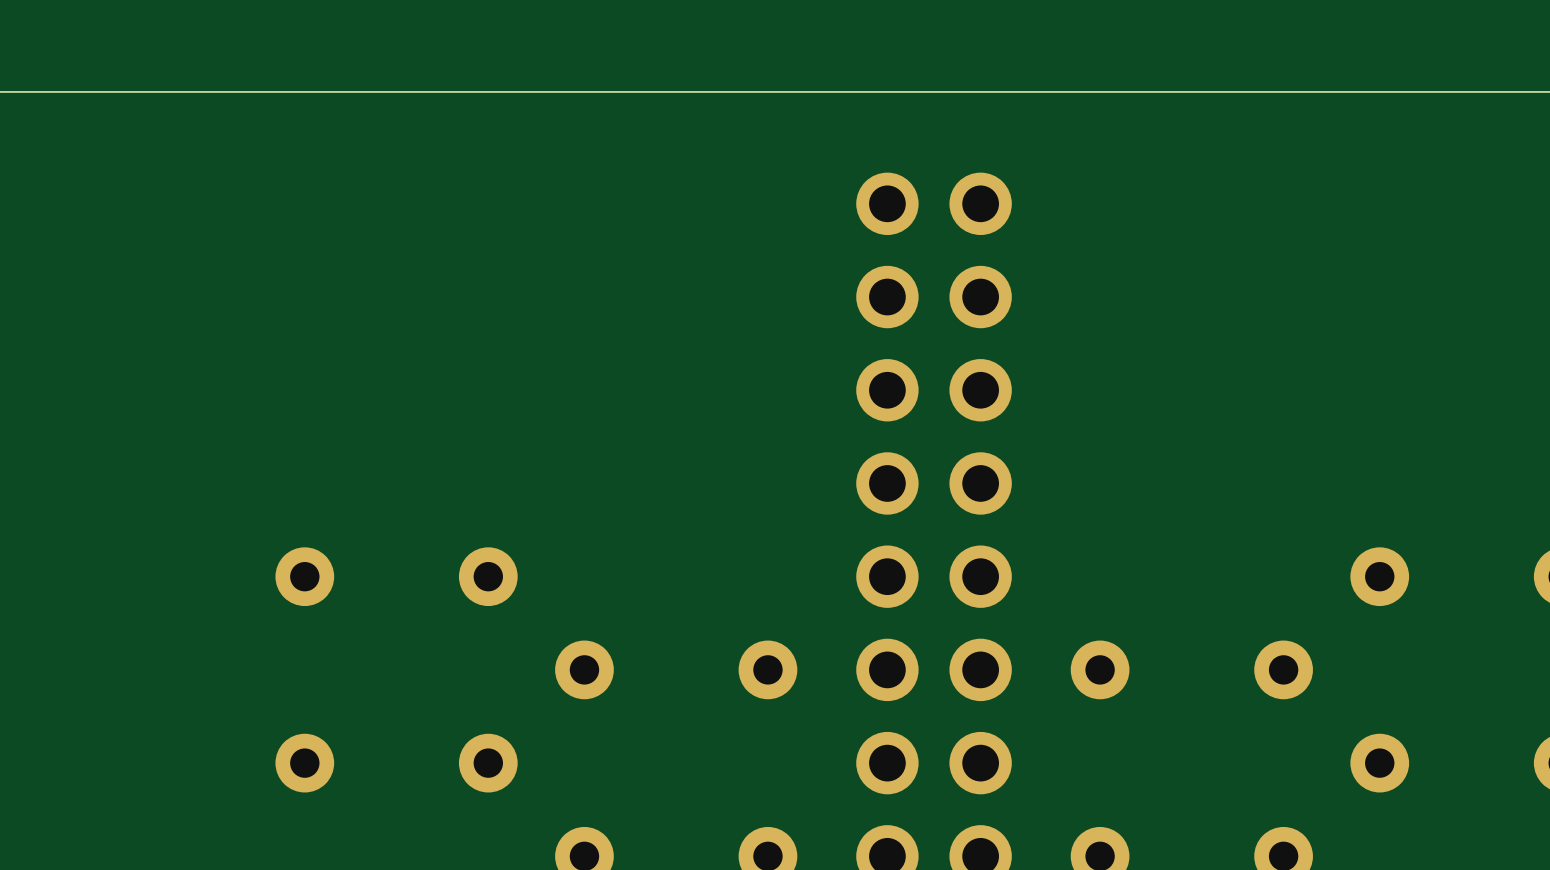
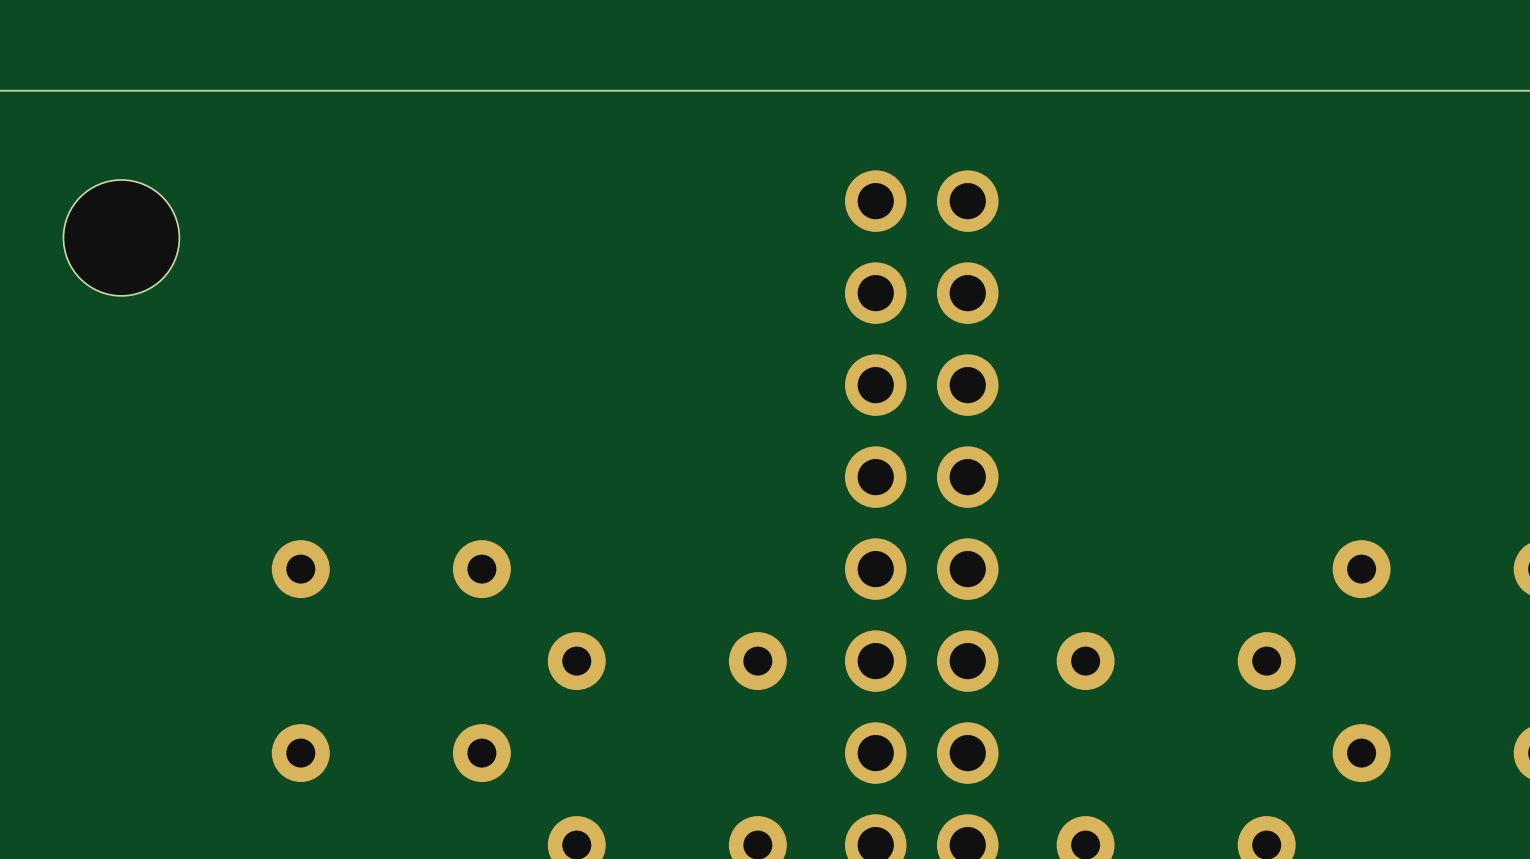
part: none -> (121, 237)

